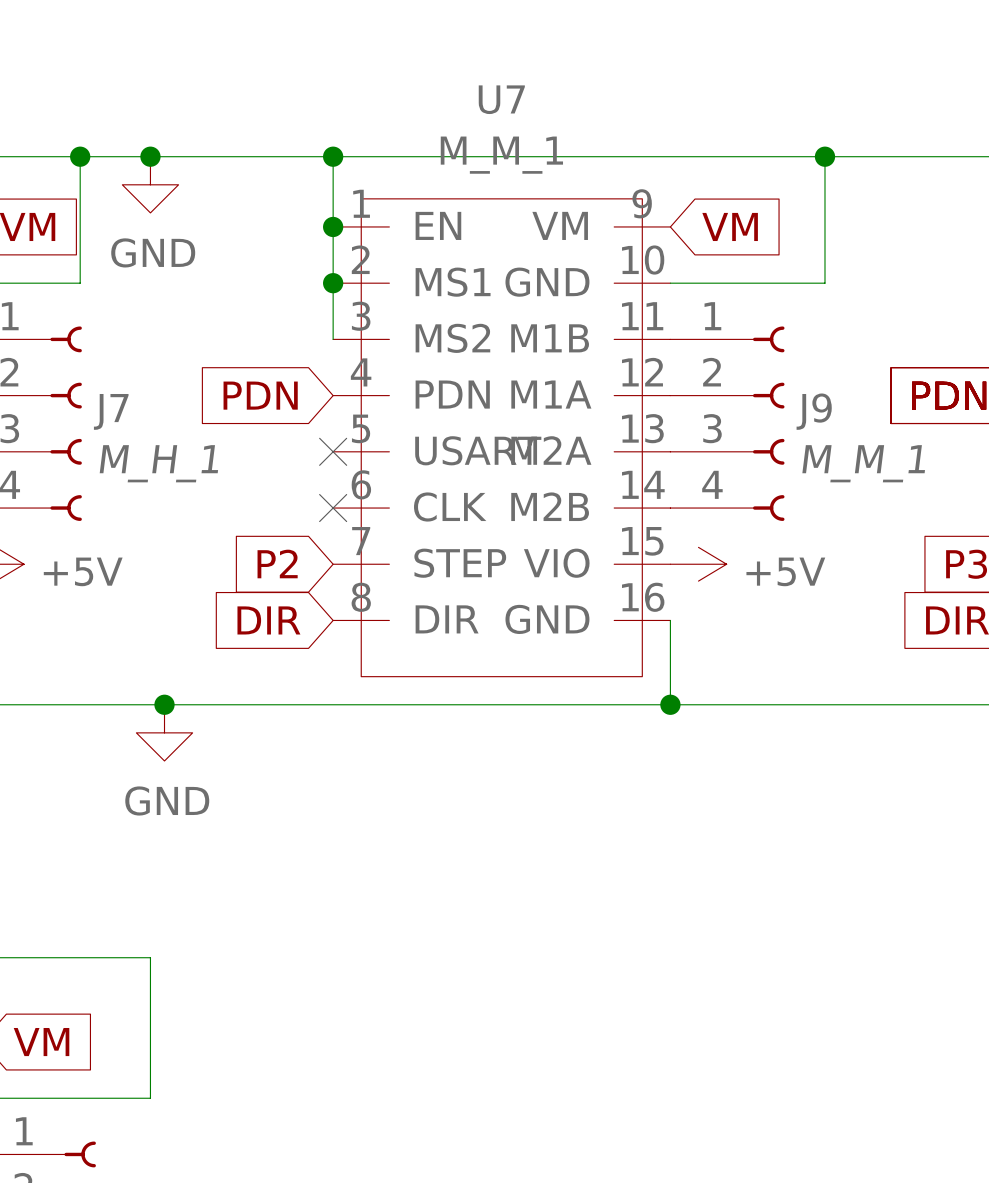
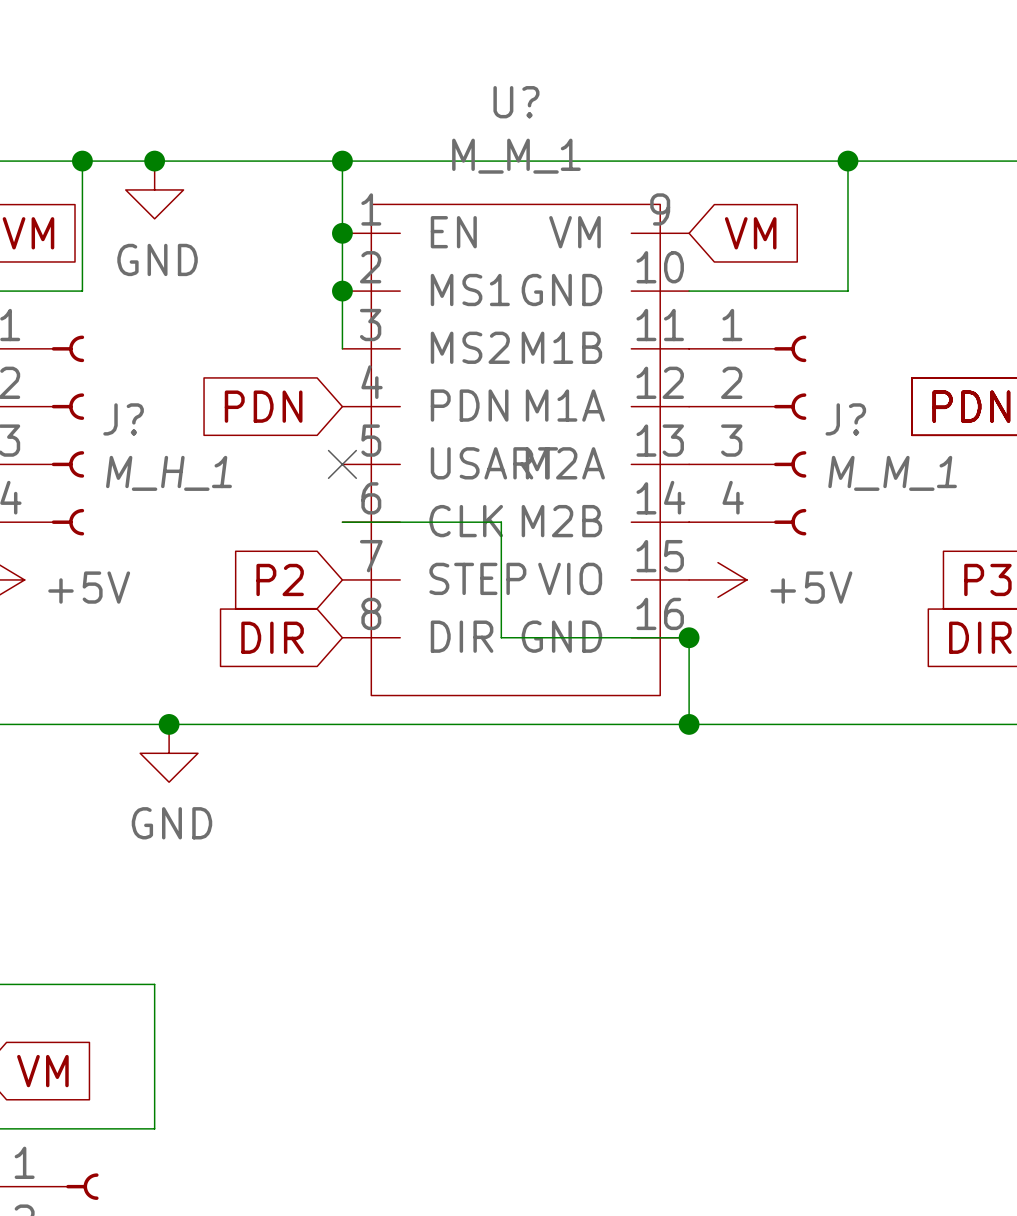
U7 name: U7 (501, 99) -> U? (516, 102)
J7 name: J7 (111, 411) -> J? (123, 419)
J9 name: J9 (814, 411) -> J? (845, 419)
wire: none -> (342, 522) (501, 522) (501, 637) (689, 637)
no-connect mark: (333, 508) -> none
junction: none -> (689, 637)

